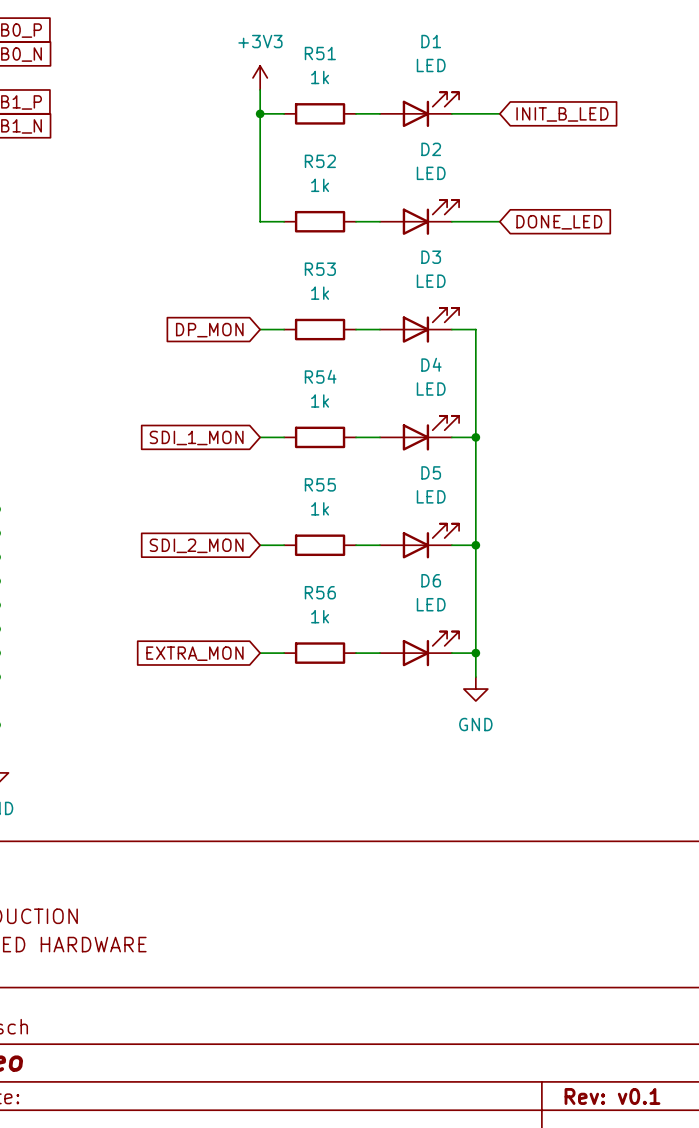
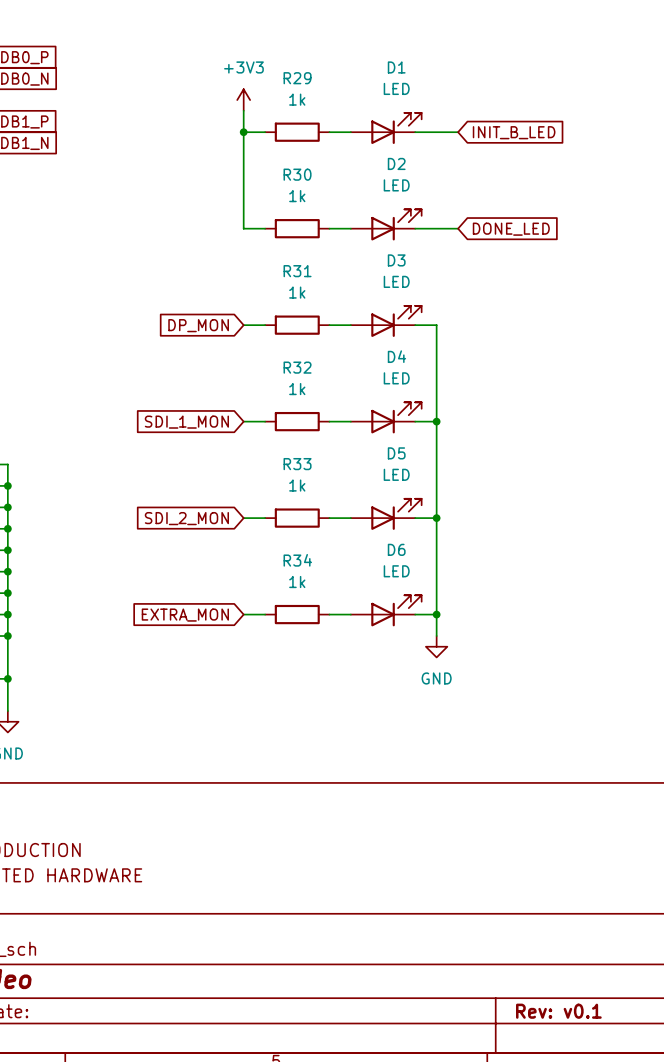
R51 name: R51 (320, 53) -> R29 (297, 78)
R52 name: R52 (320, 161) -> R30 (297, 174)
R53 name: R53 (320, 269) -> R31 (297, 271)
R54 name: R54 (320, 376) -> R32 (297, 367)
R55 name: R55 (320, 484) -> R33 (297, 464)
R56 name: R56 (320, 592) -> R34 (297, 560)

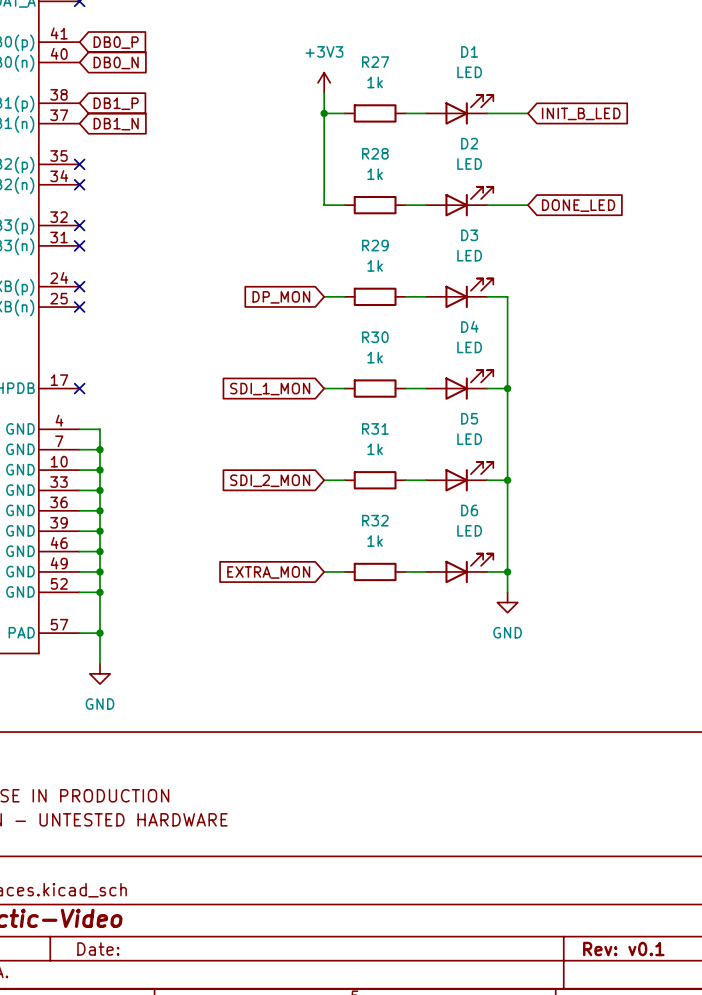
R29 name: R29 (297, 78) -> R27 (375, 62)
R30 name: R30 (297, 174) -> R28 (375, 153)
R31 name: R31 (297, 271) -> R29 (375, 245)
R32 name: R32 (297, 367) -> R30 (375, 337)
R33 name: R33 (297, 464) -> R31 (375, 428)
R34 name: R34 (297, 560) -> R32 (375, 520)

